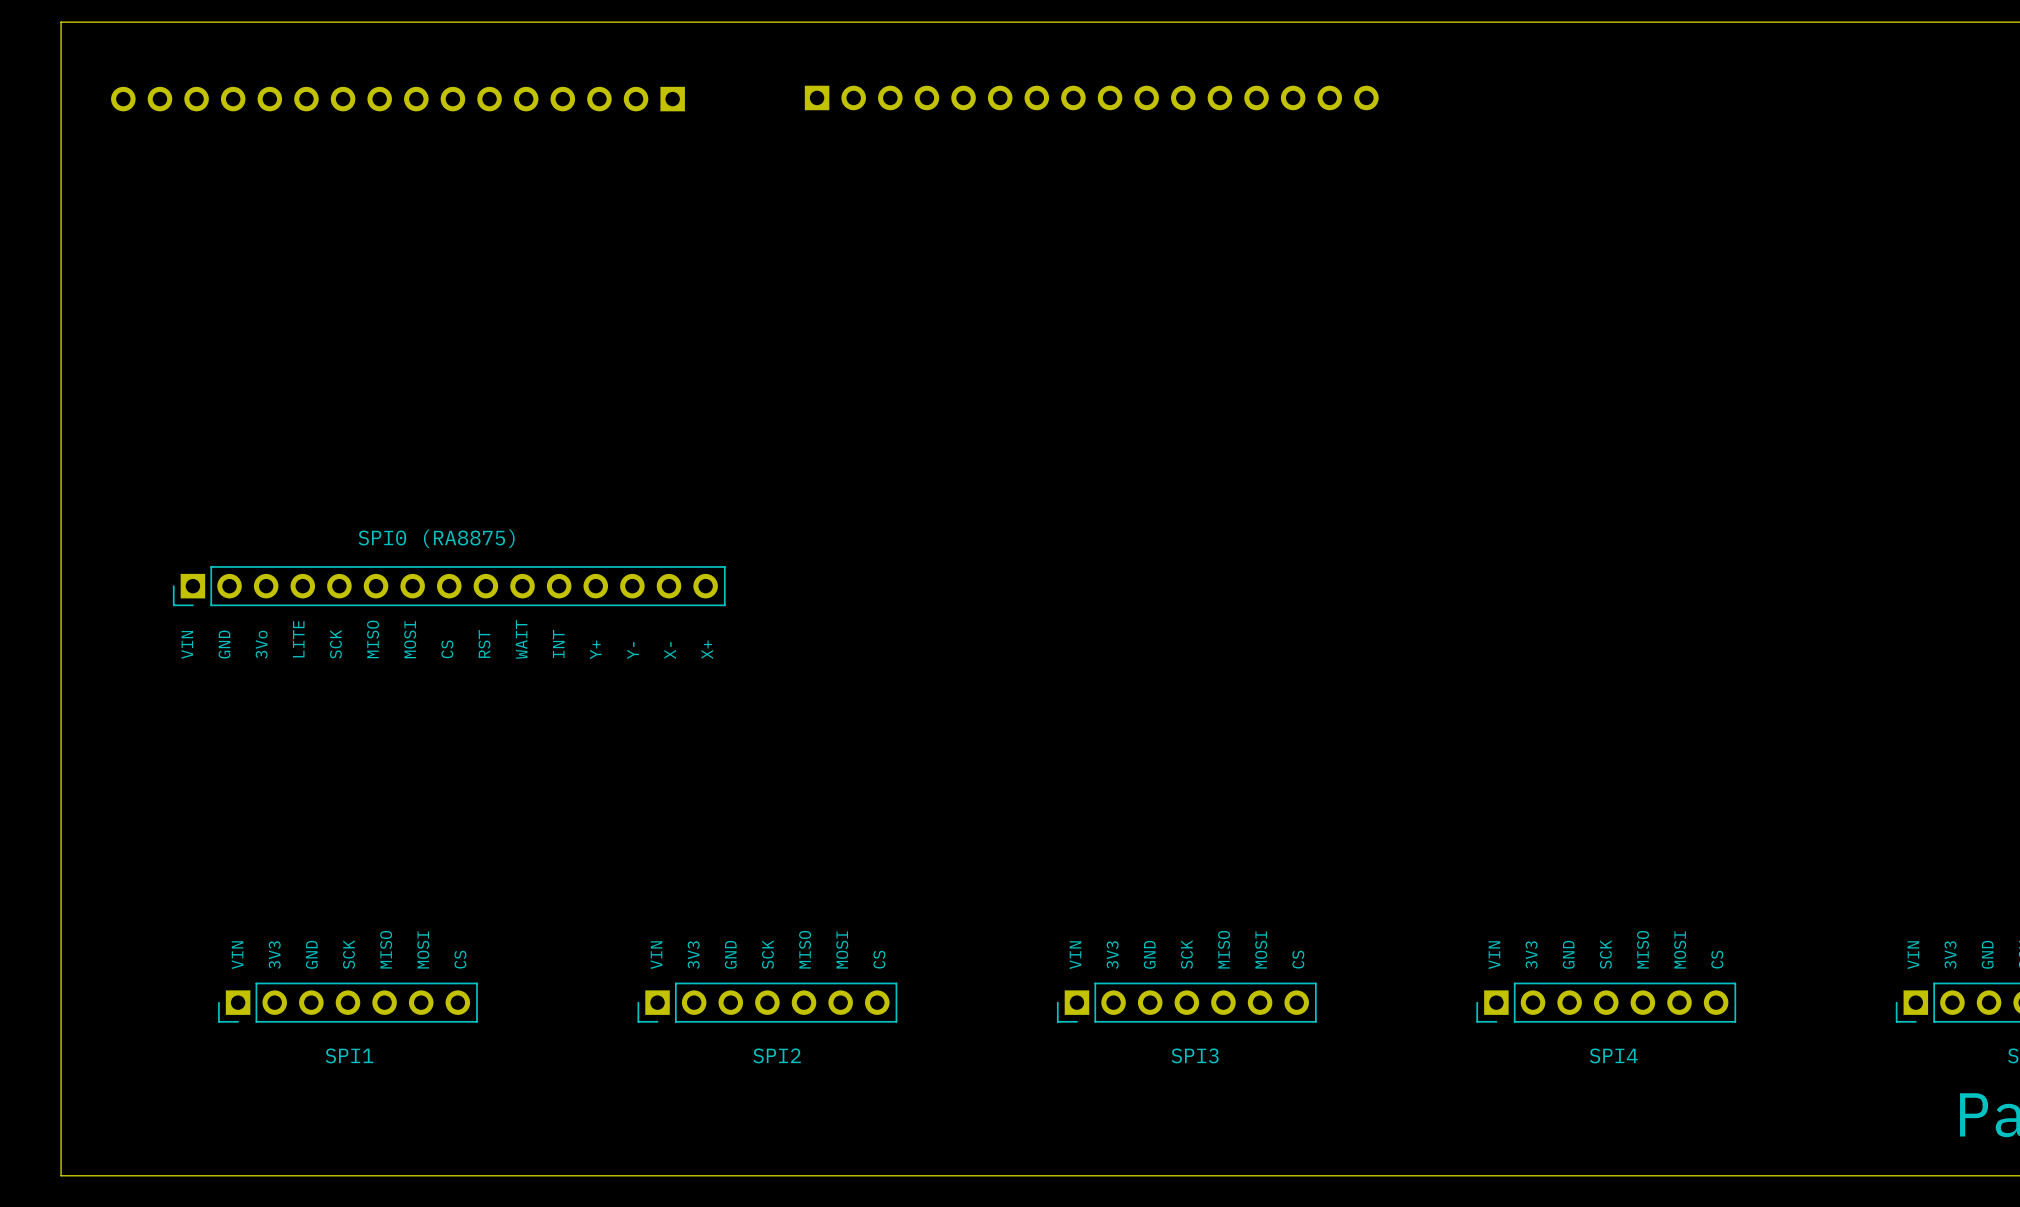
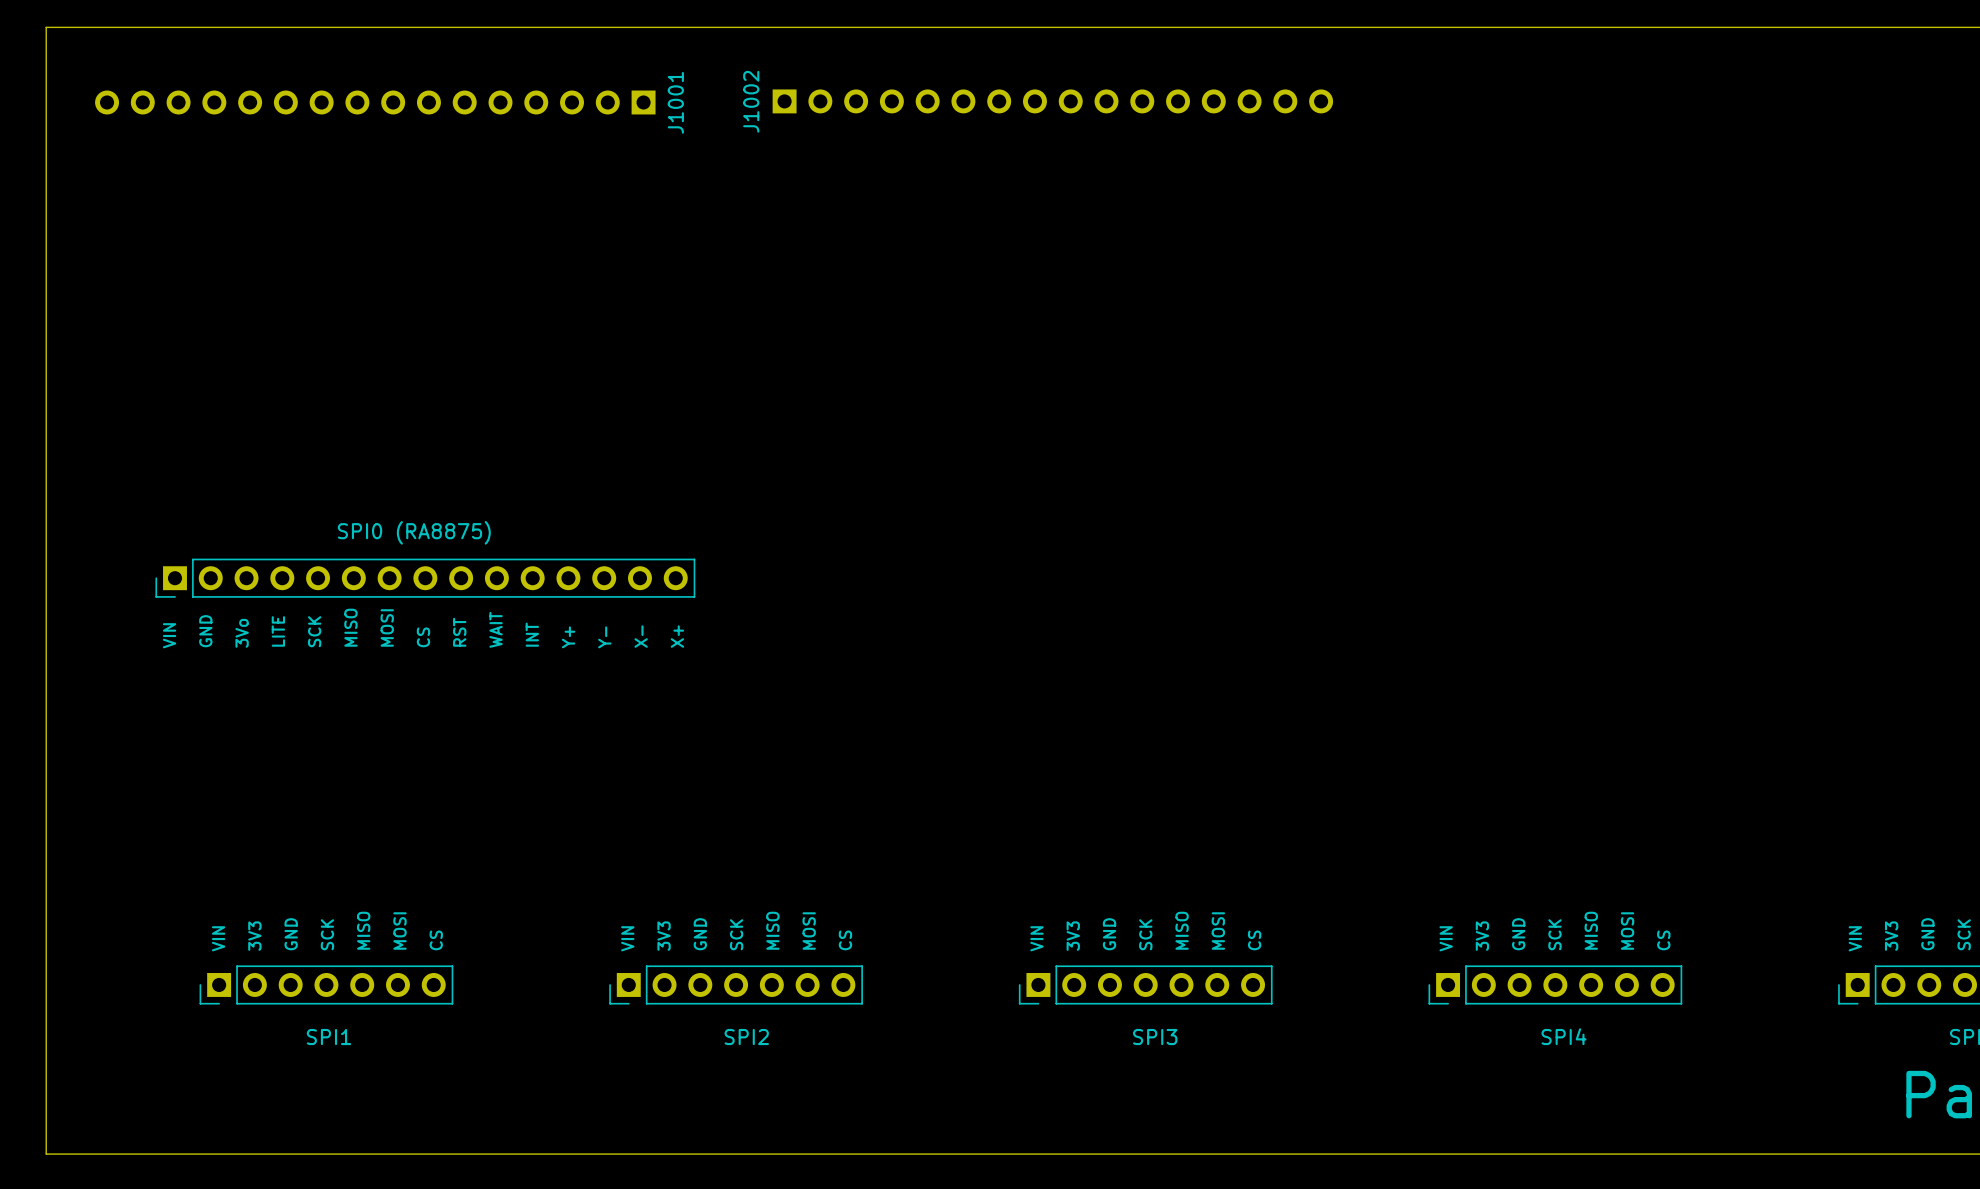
J1002 name: none -> J1002 (751, 101)
J1001 name: none -> J1001 (675, 102)

